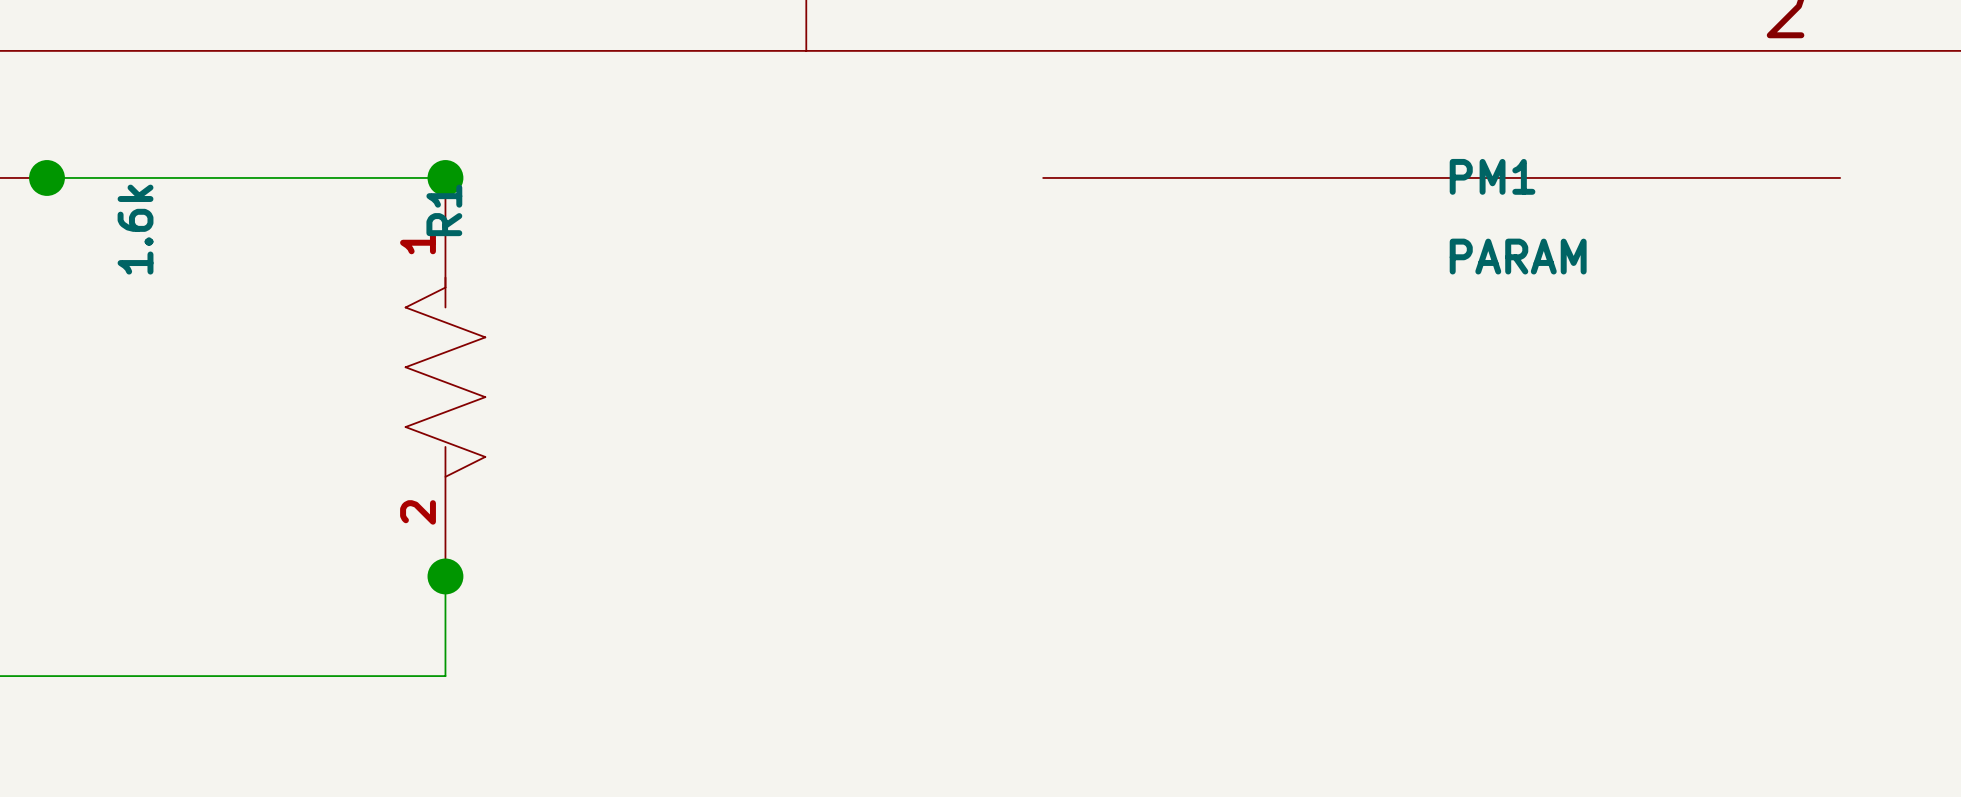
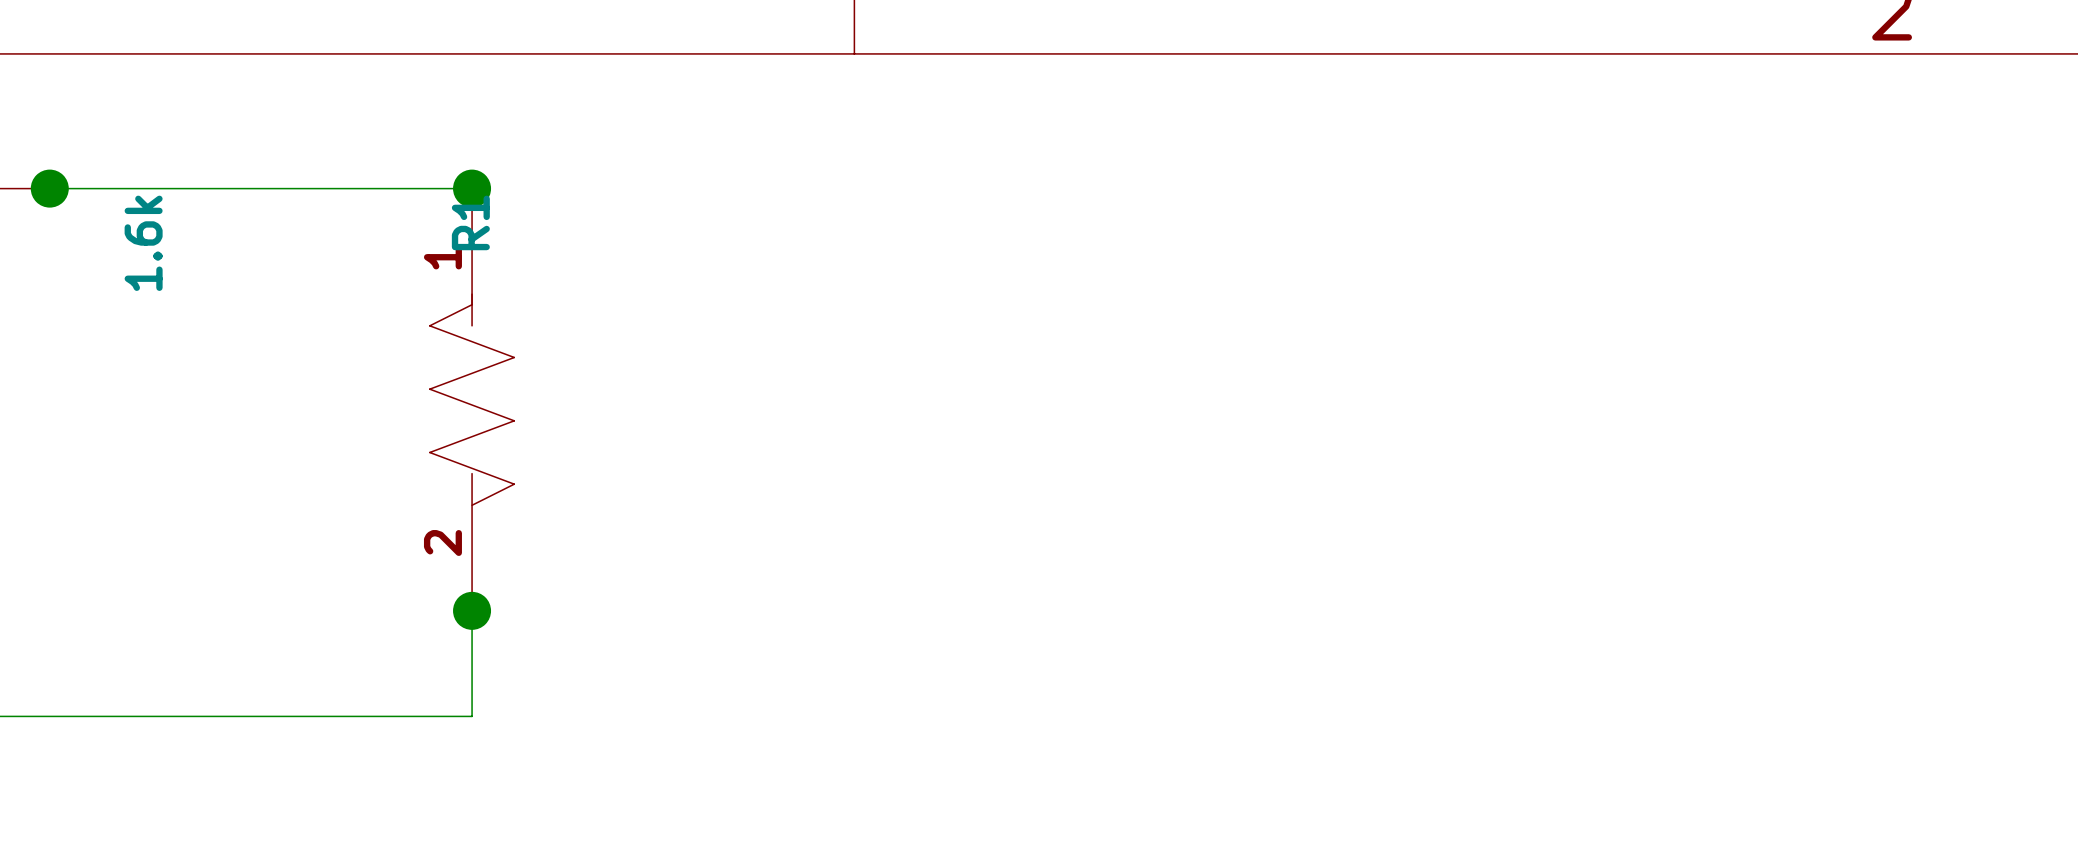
PM1: PARAM (1441, 177) -> none

